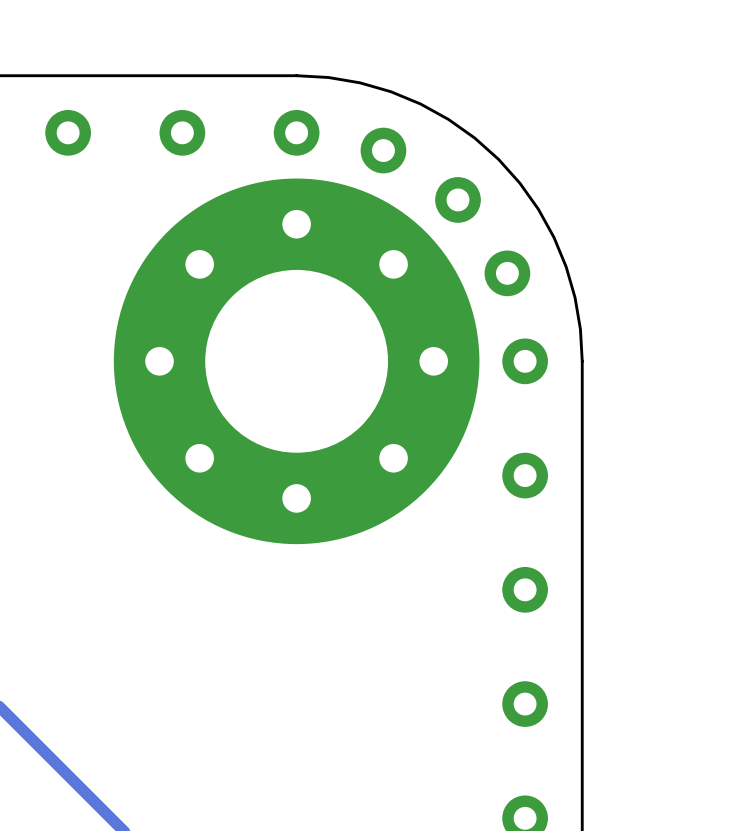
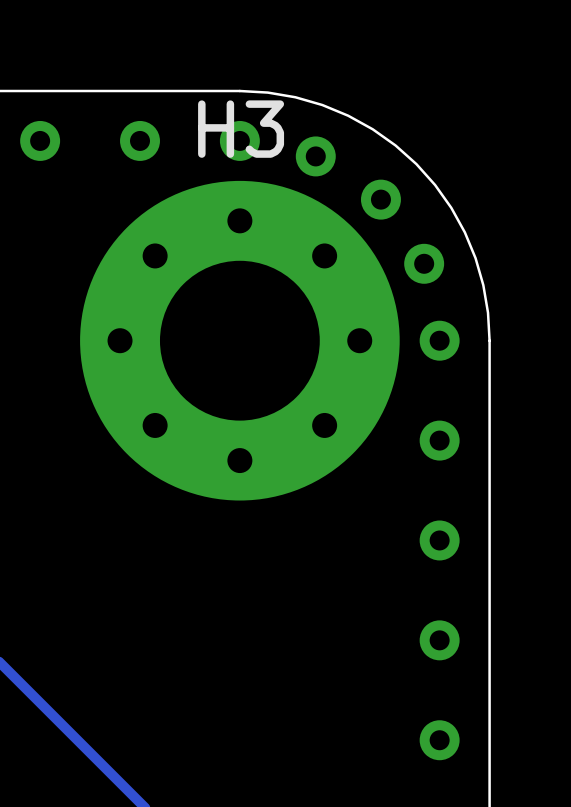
H3 name: none -> H3 (241, 129)

